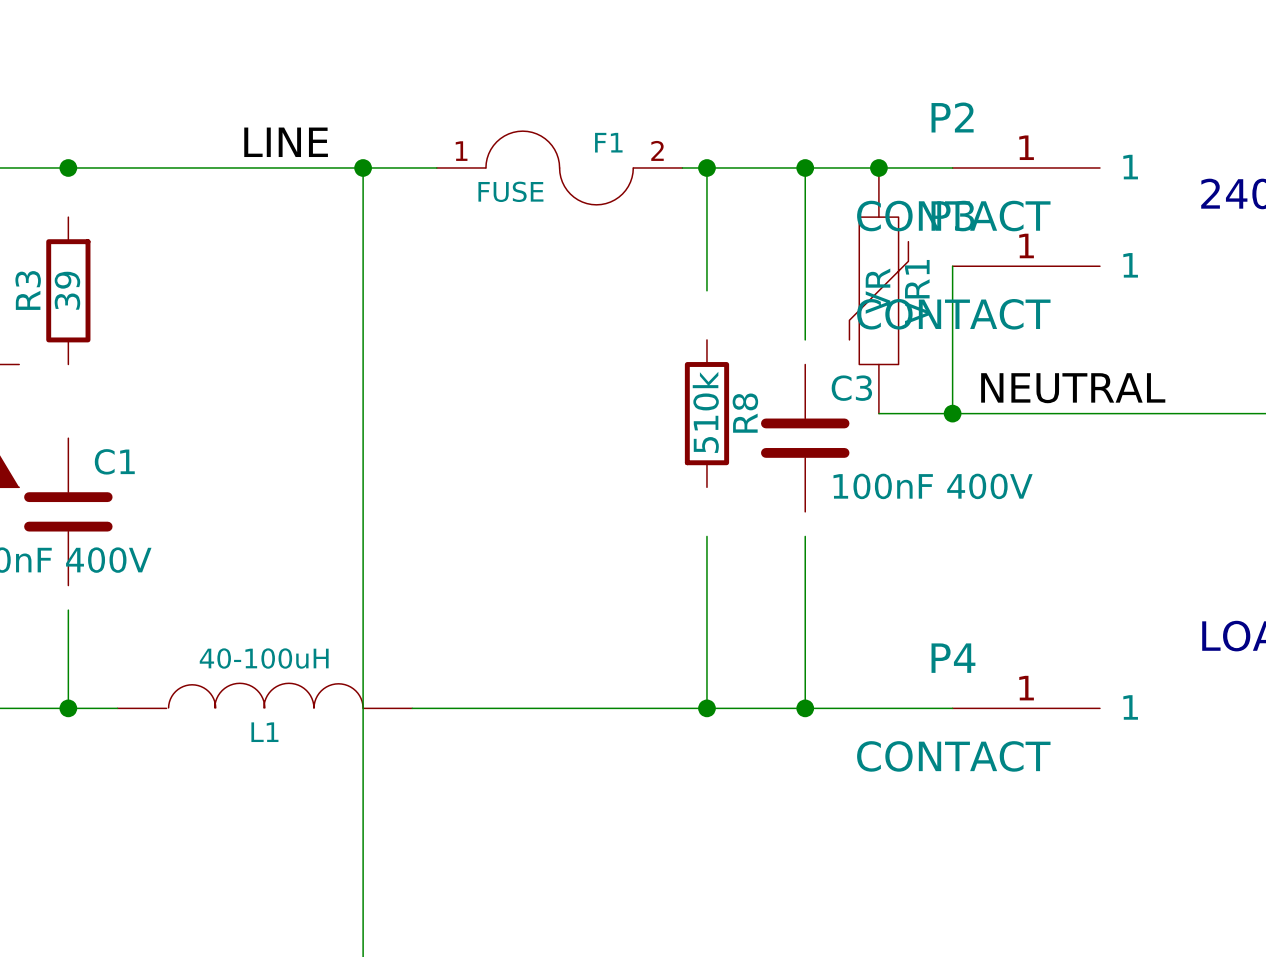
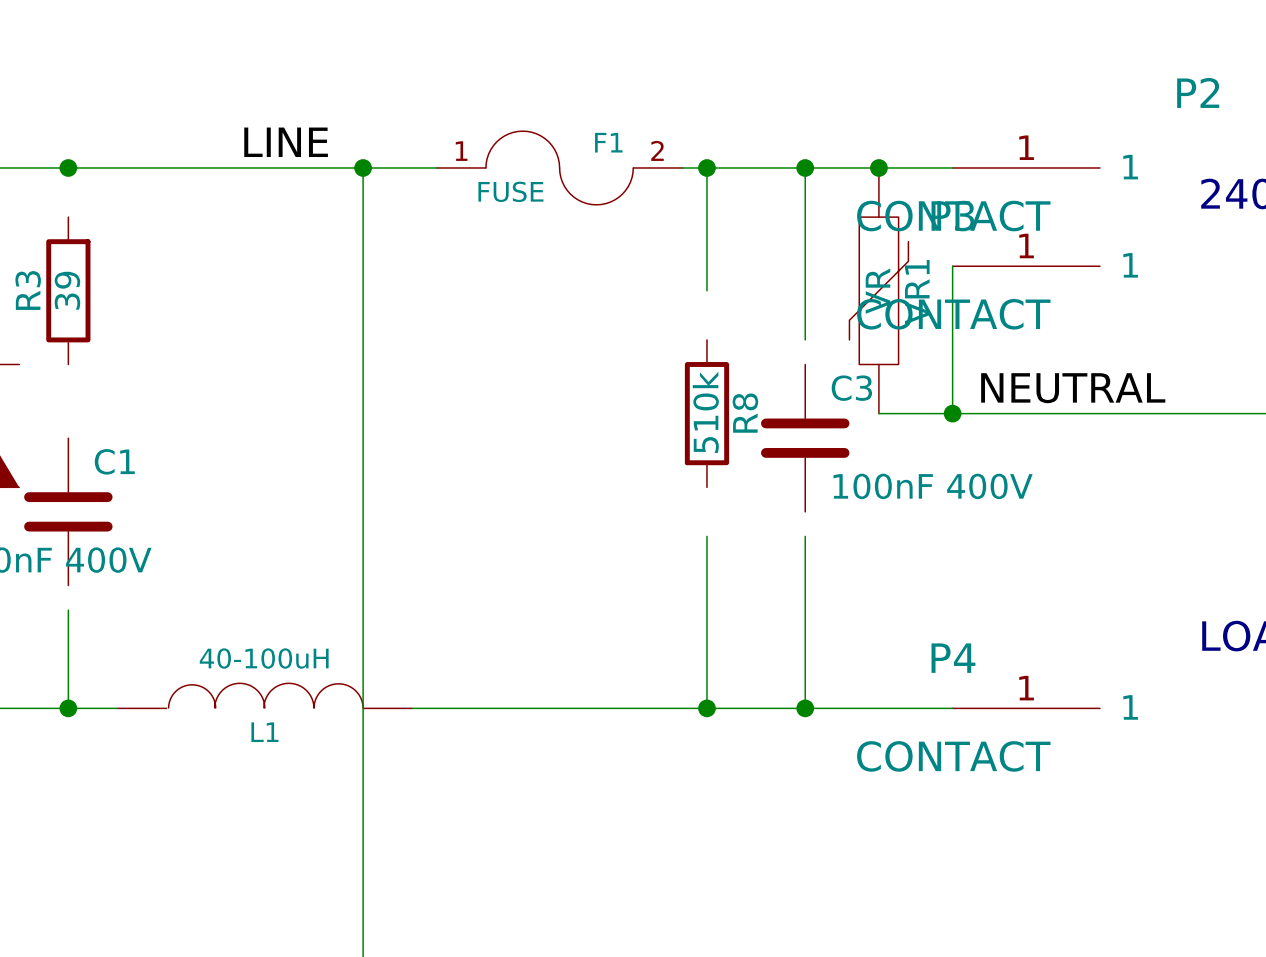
P2 name position: P2 (952, 117) -> P2 (1198, 92)

